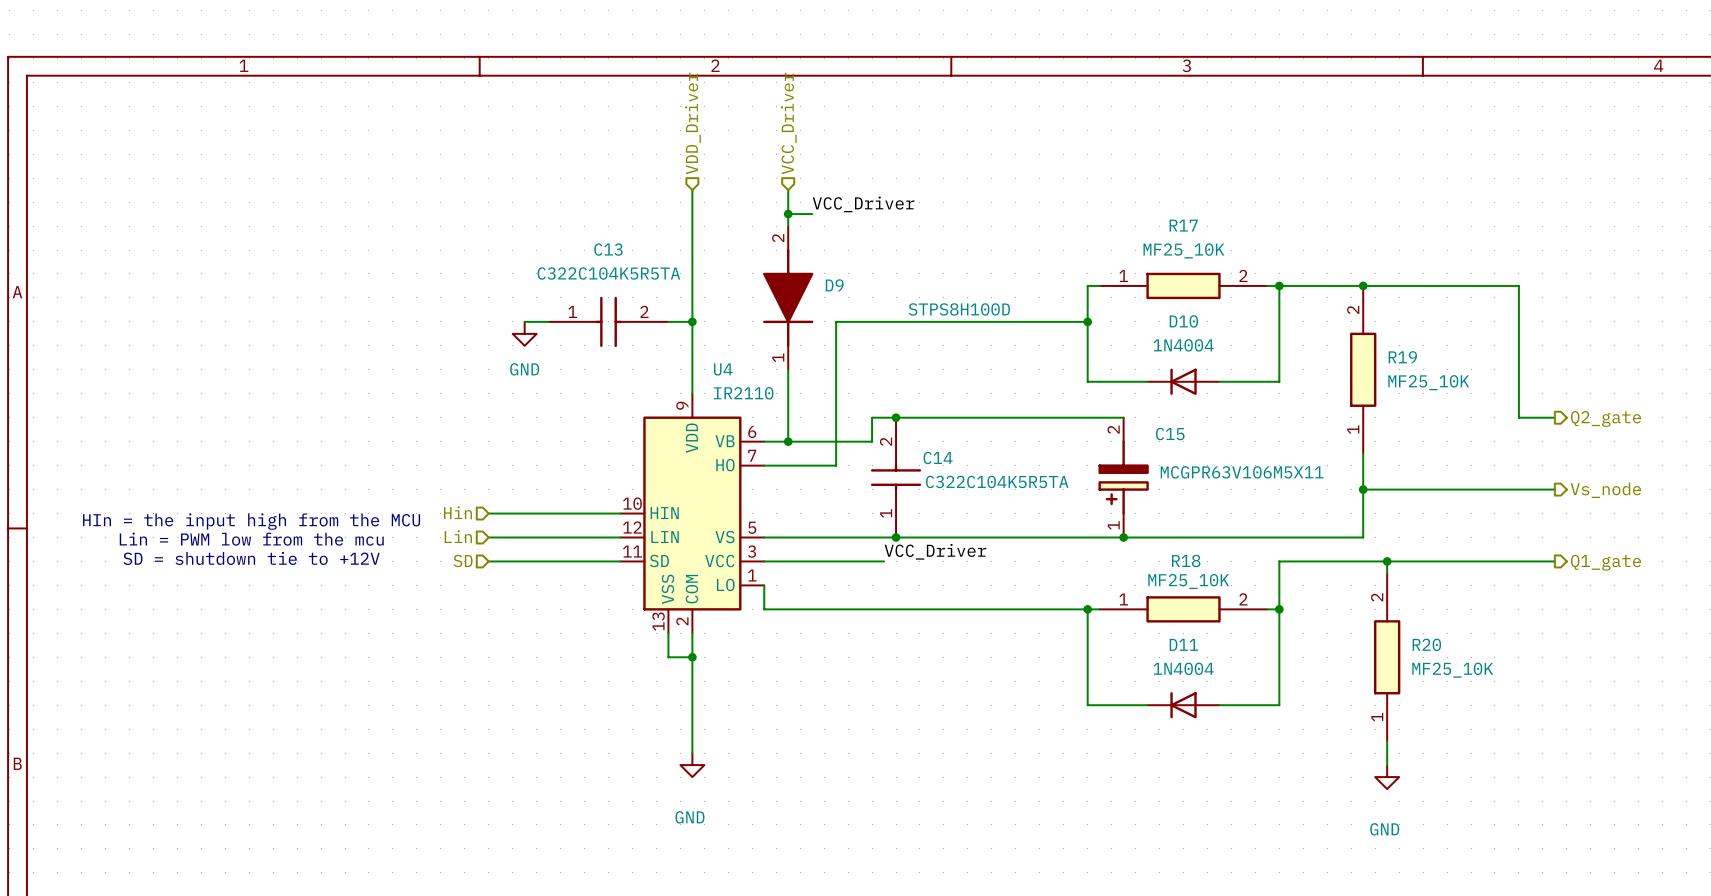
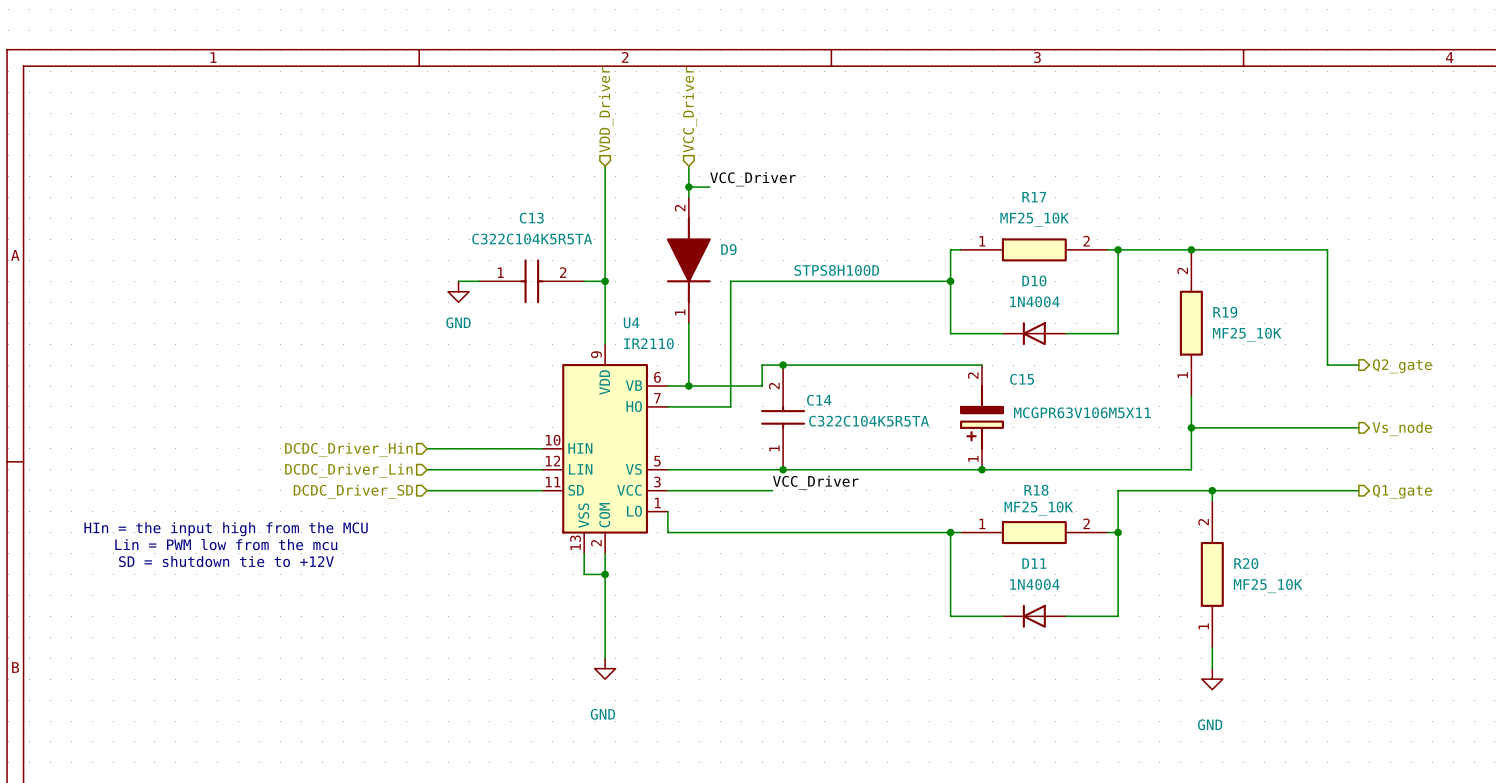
hierarchical label: Hin (457, 512) -> DCDC_Driver_Hin (348, 449)
text position: HIn = the input high from the MCU (251, 521) -> HIn = the input high from the MCU (226, 529)
hierarchical label: Lin (458, 536) -> DCDC_Driver_Lin (348, 470)
text position: Lin = PWM low from the mcu (251, 539) -> Lin = PWM low from the mcu (226, 544)
text position: SD = shutdown tie to +12V (251, 558) -> SD = shutdown tie to +12V (226, 561)
hierarchical label: SD (463, 561) -> DCDC_Driver_SD (353, 491)

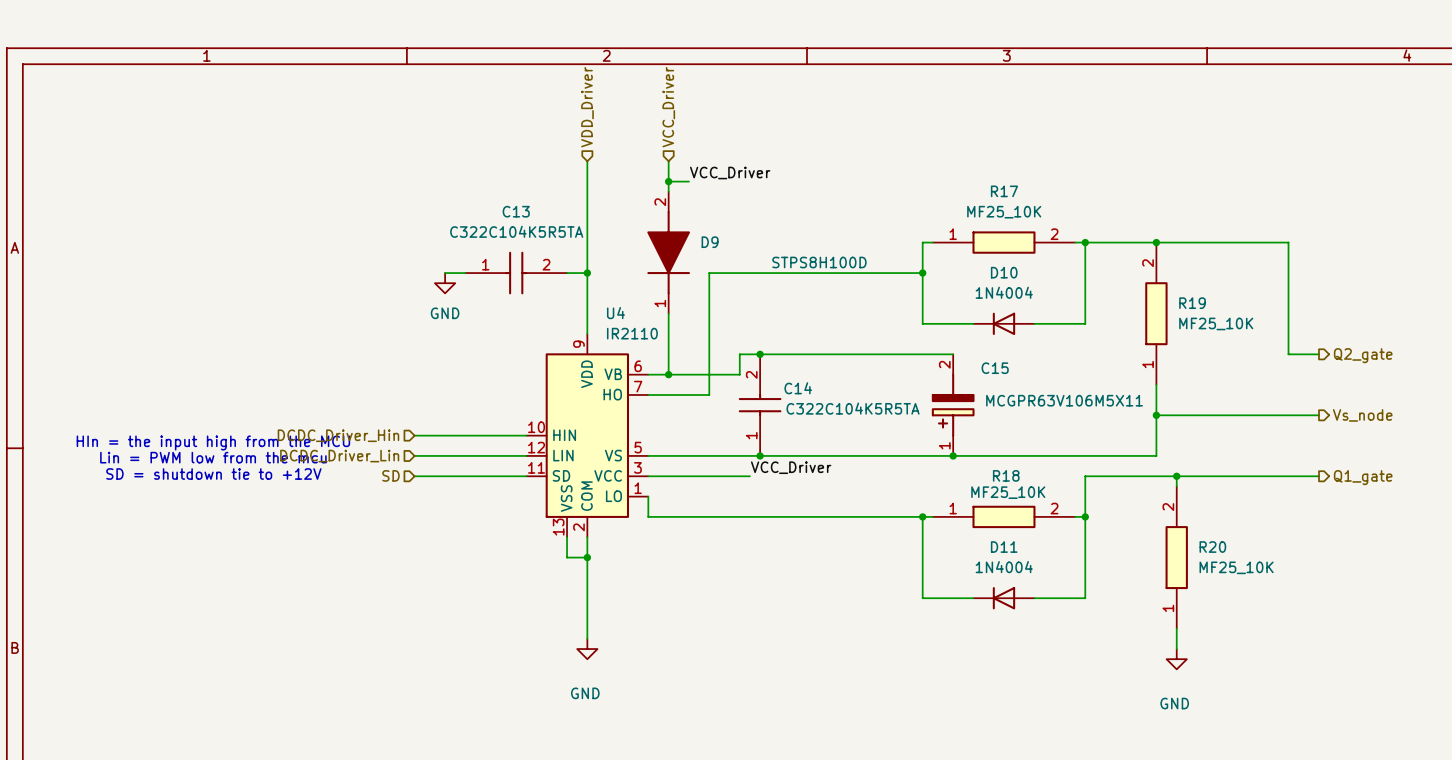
hierarchical label: DCDC_Driver_SD (353, 491) -> SD (390, 475)
text position: HIn = the input high from the MCU (226, 529) -> HIn = the input high from the MCU (213, 442)
text position: Lin = PWM low from the mcu (226, 544) -> Lin = PWM low from the mcu (213, 457)
text position: SD = shutdown tie to +12V (226, 561) -> SD = shutdown tie to +12V (213, 474)

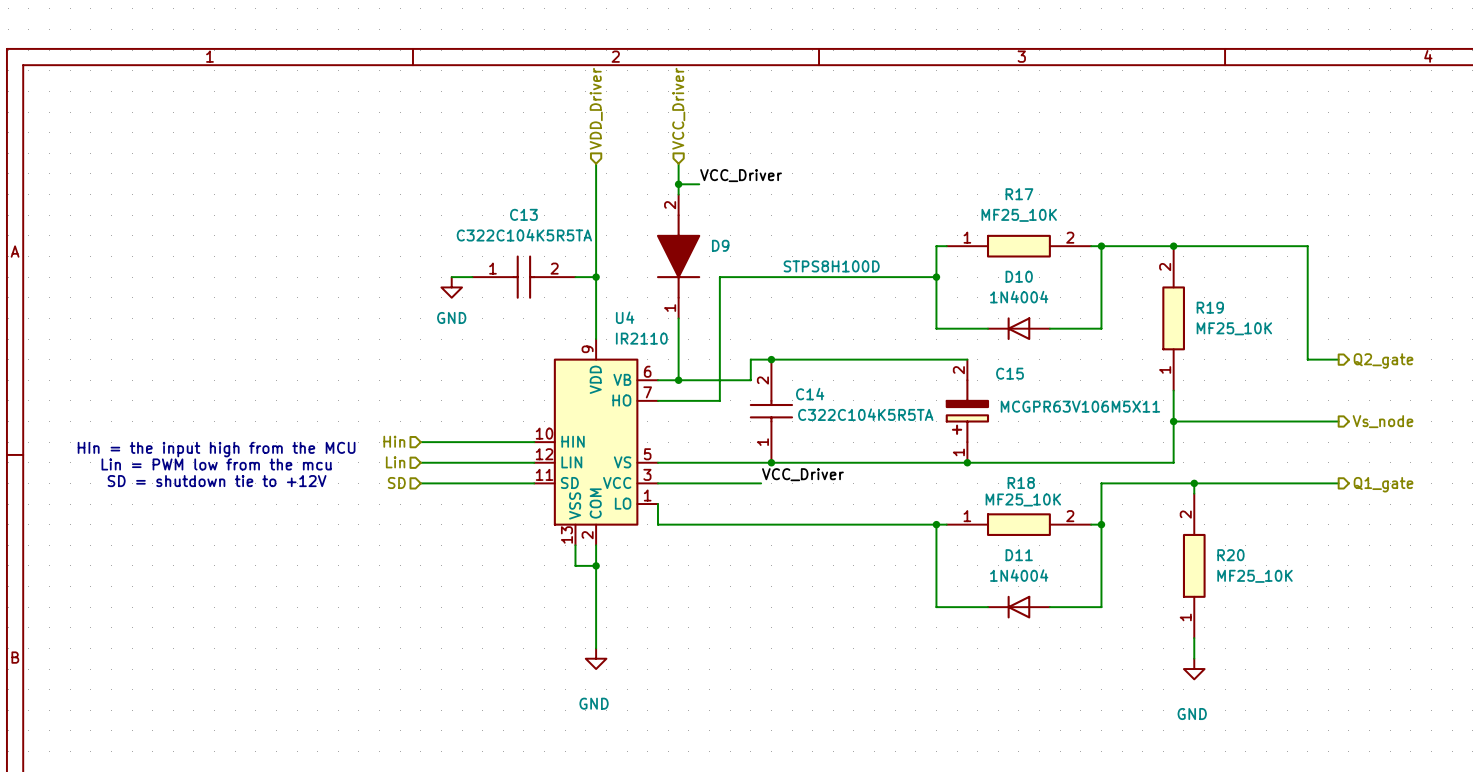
hierarchical label: DCDC_Driver_Hin (338, 435) -> Hin (394, 441)
hierarchical label: DCDC_Driver_Lin (339, 456) -> Lin (395, 462)

